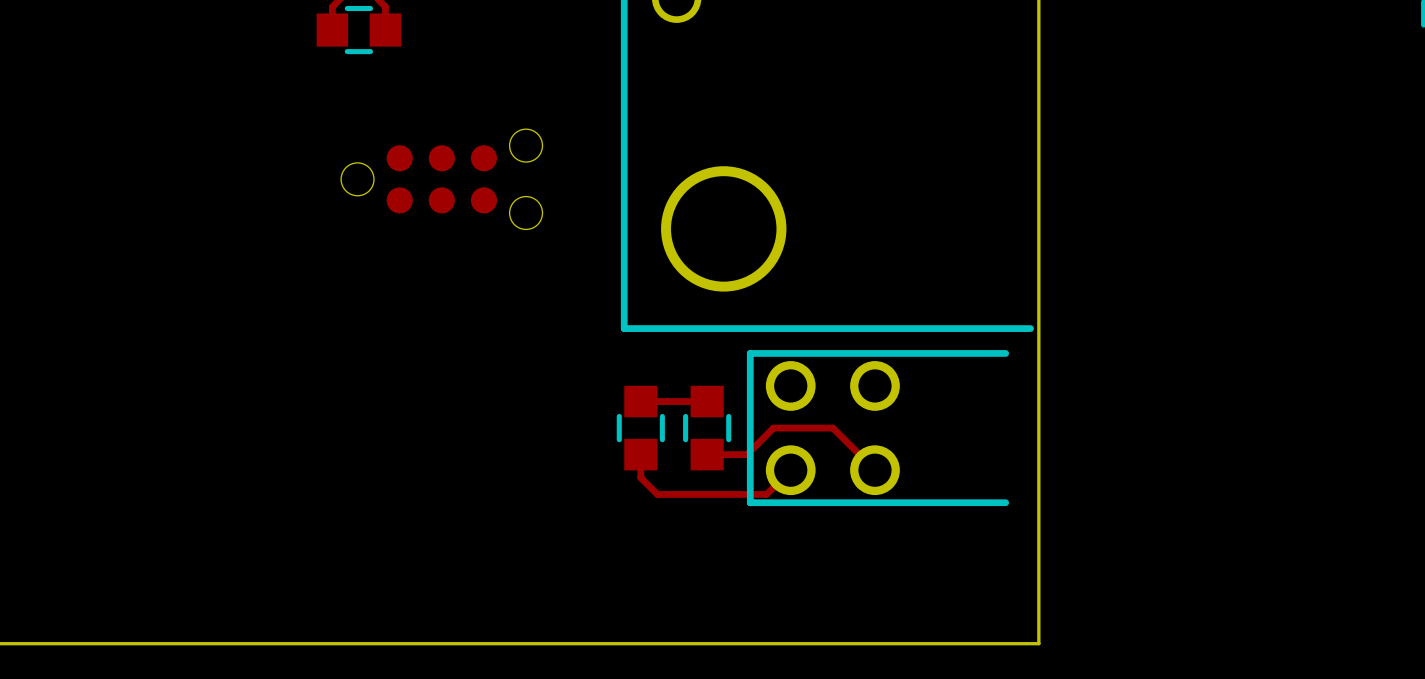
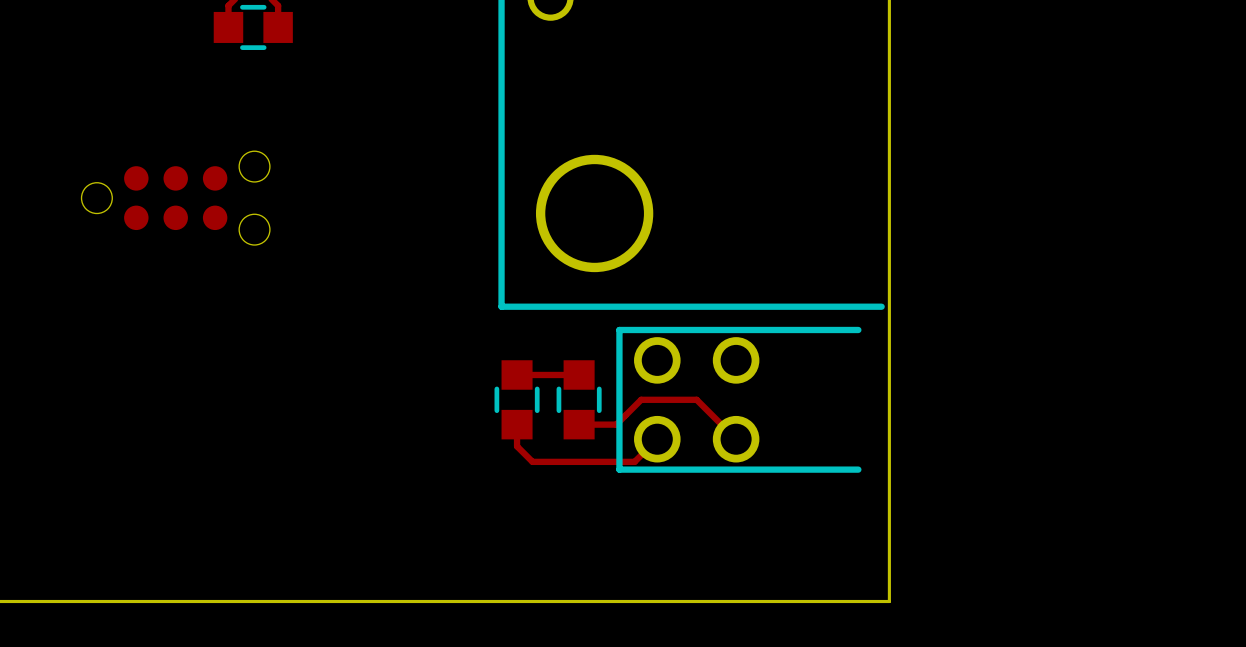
part position: (441, 179) -> (175, 198)

